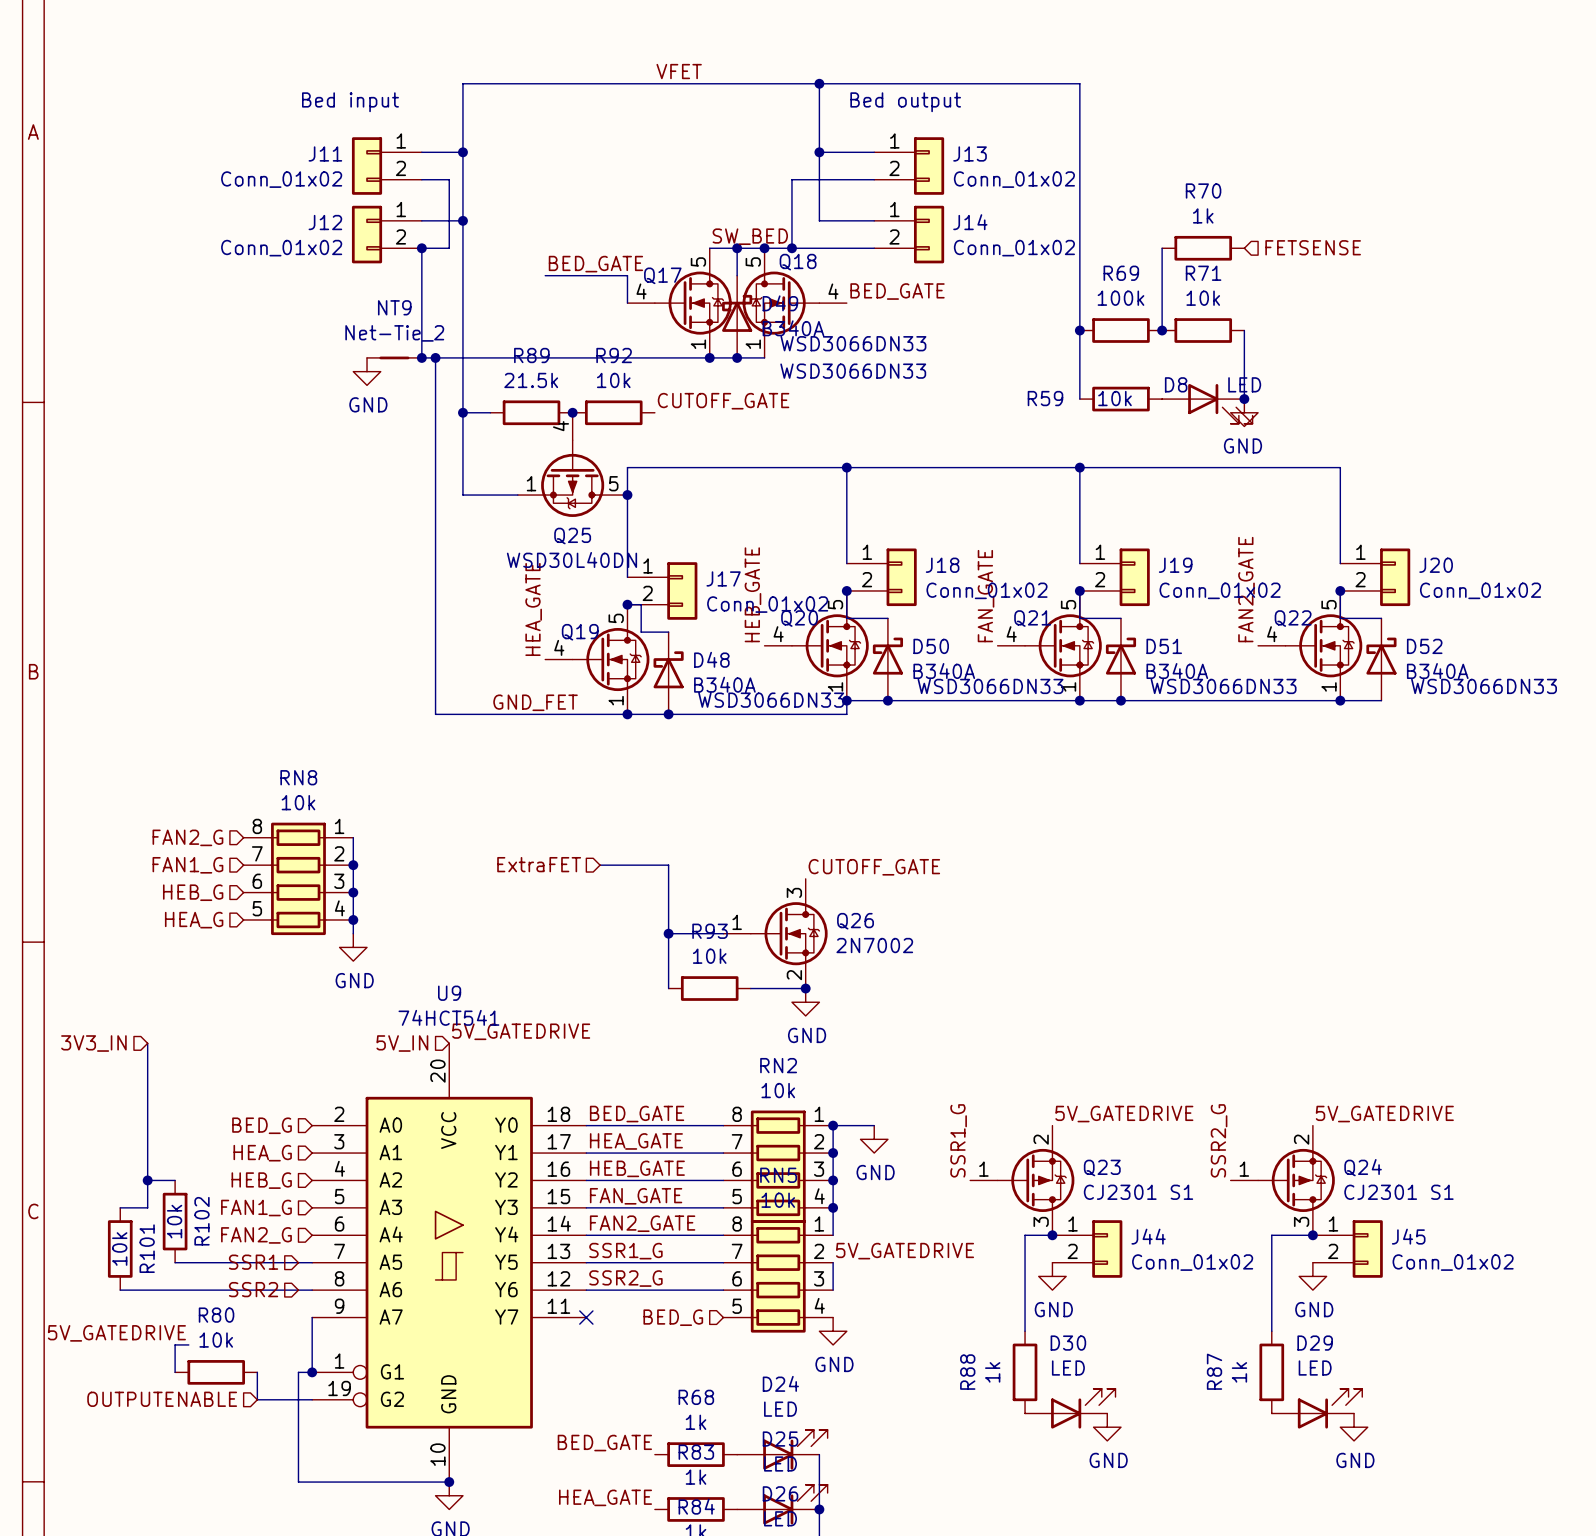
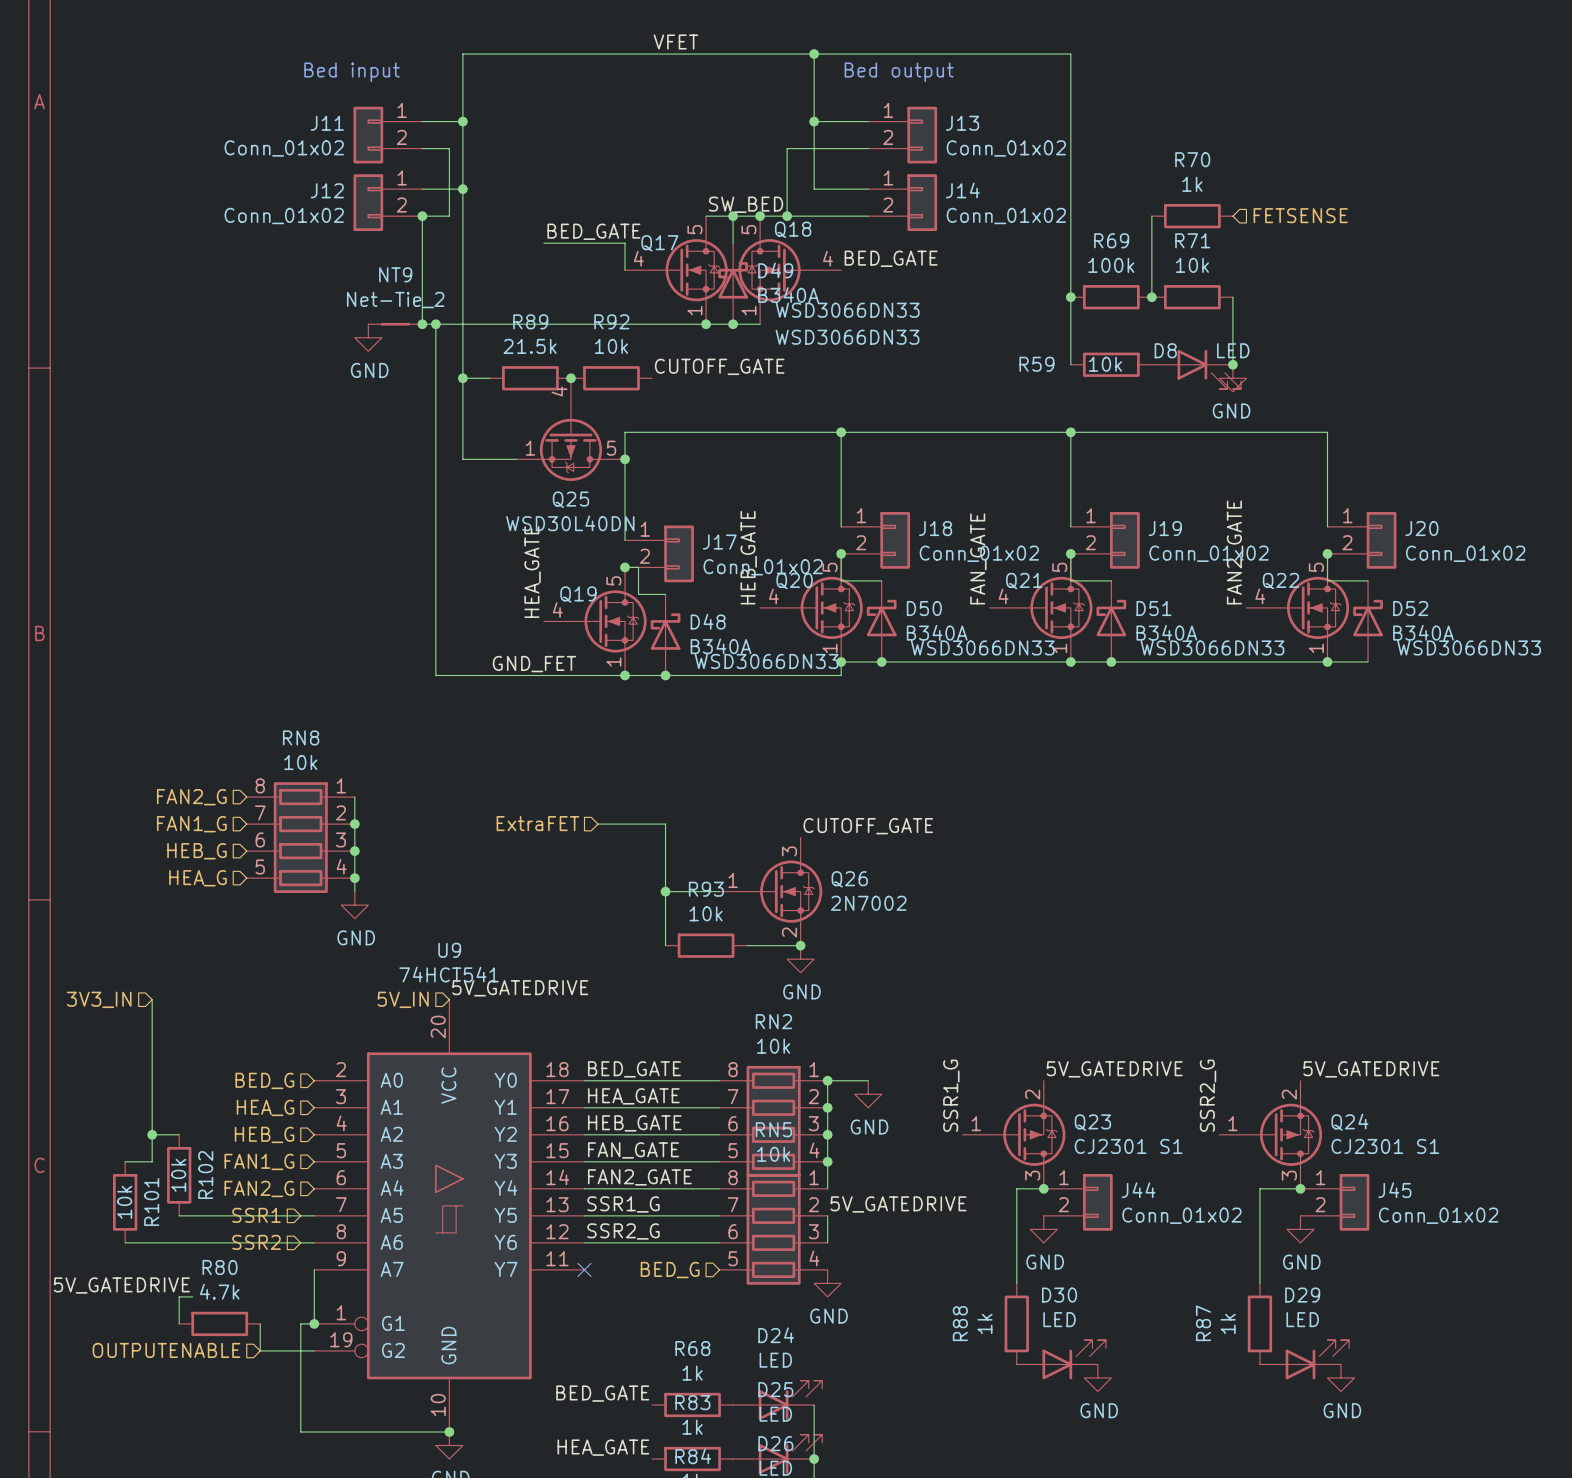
R80 value: 10k (216, 1340) -> 4.7k (219, 1291)

